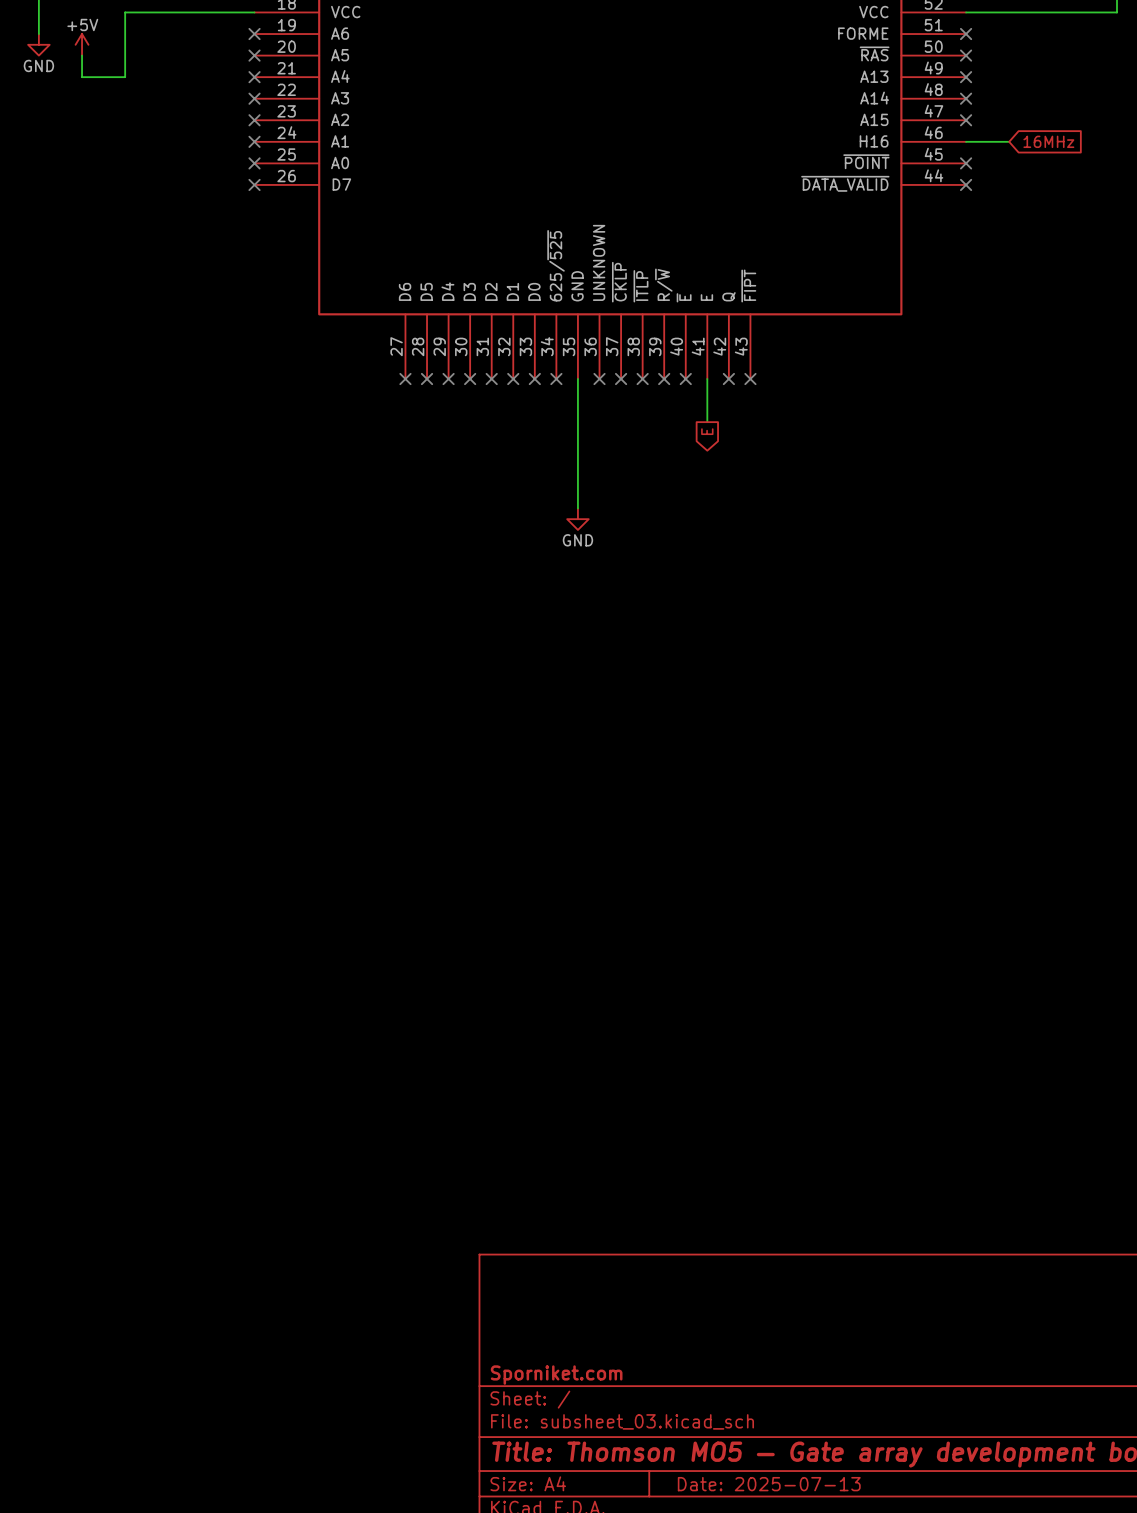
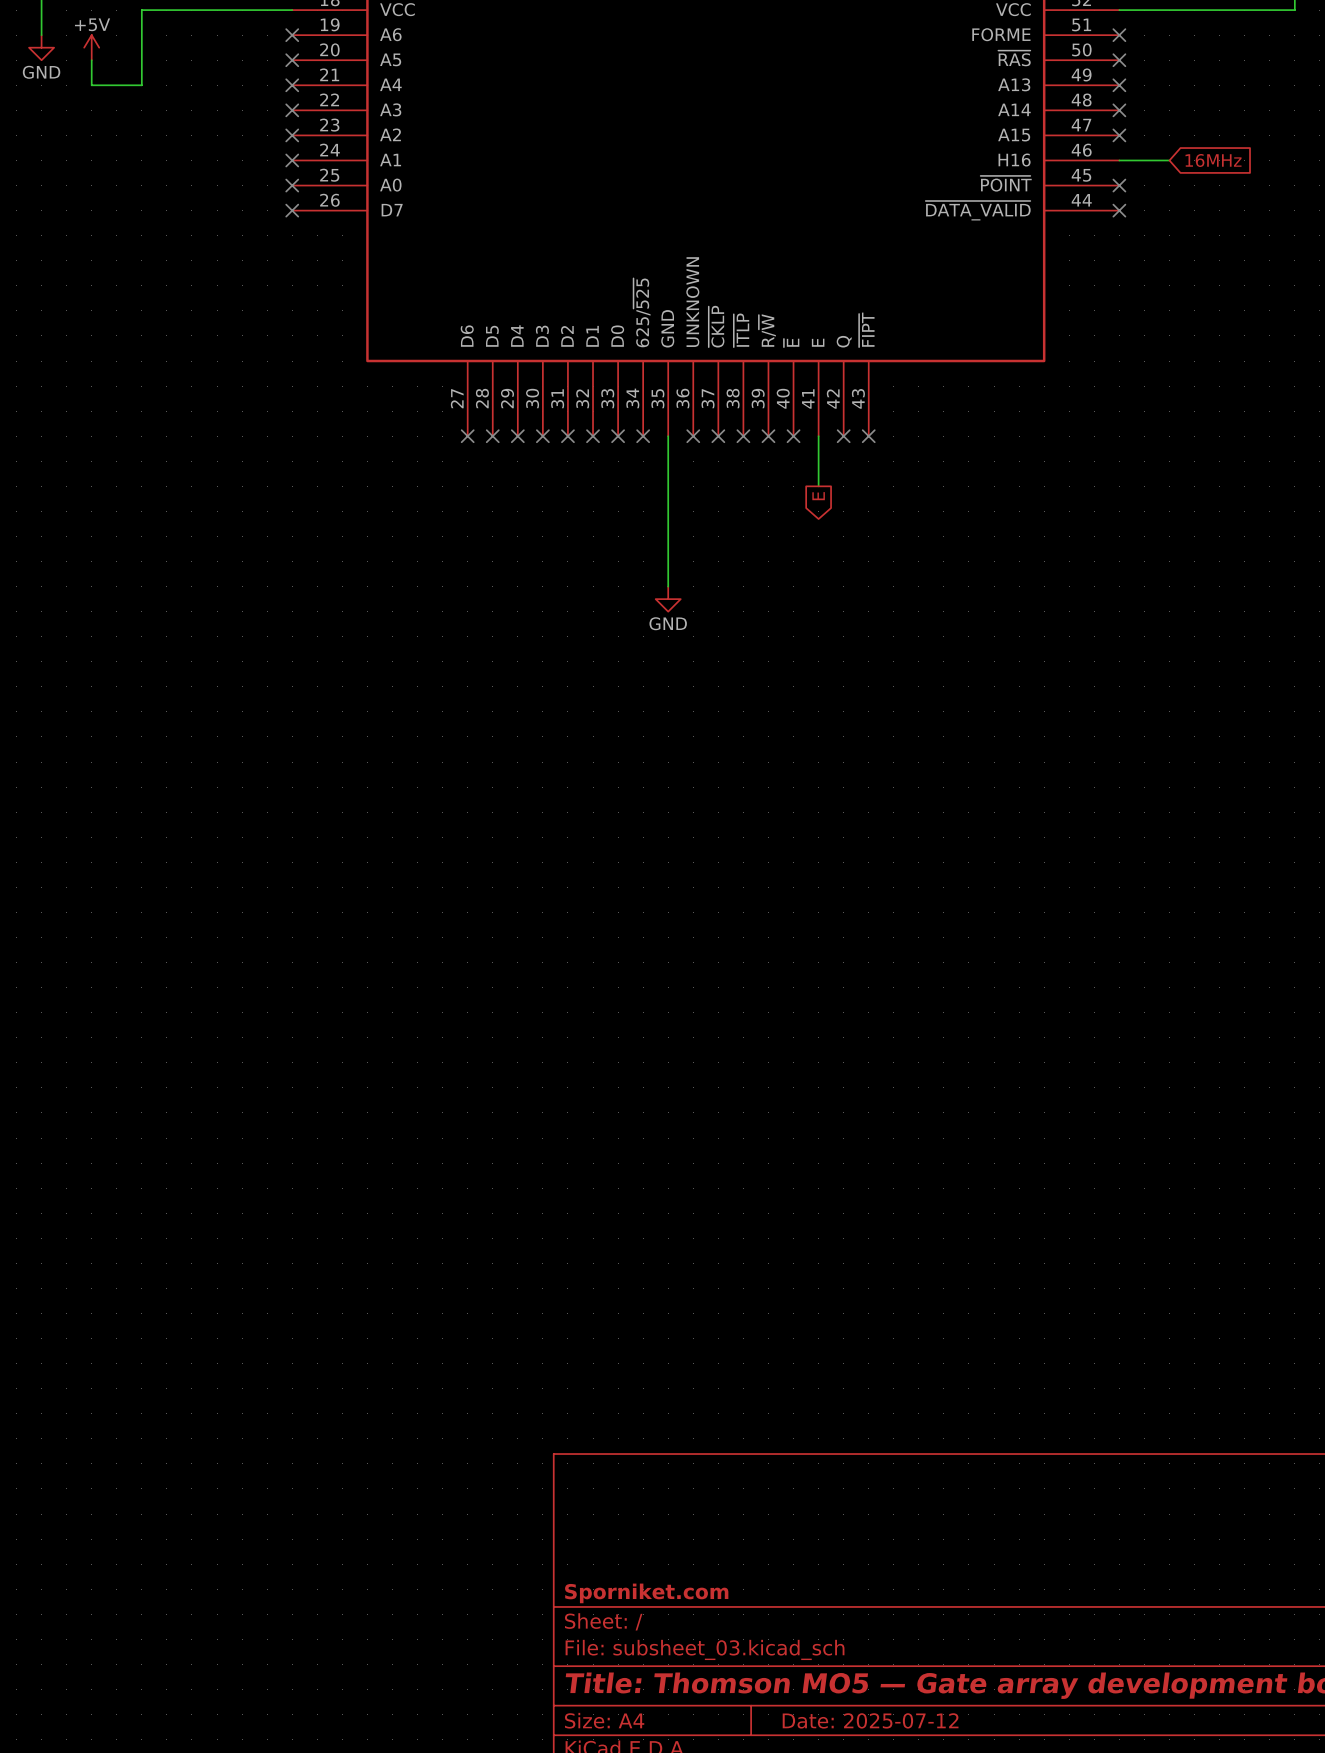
title block: Date: 2025-07-13 (769, 1484) -> Date: 2025-07-12 (870, 1720)

